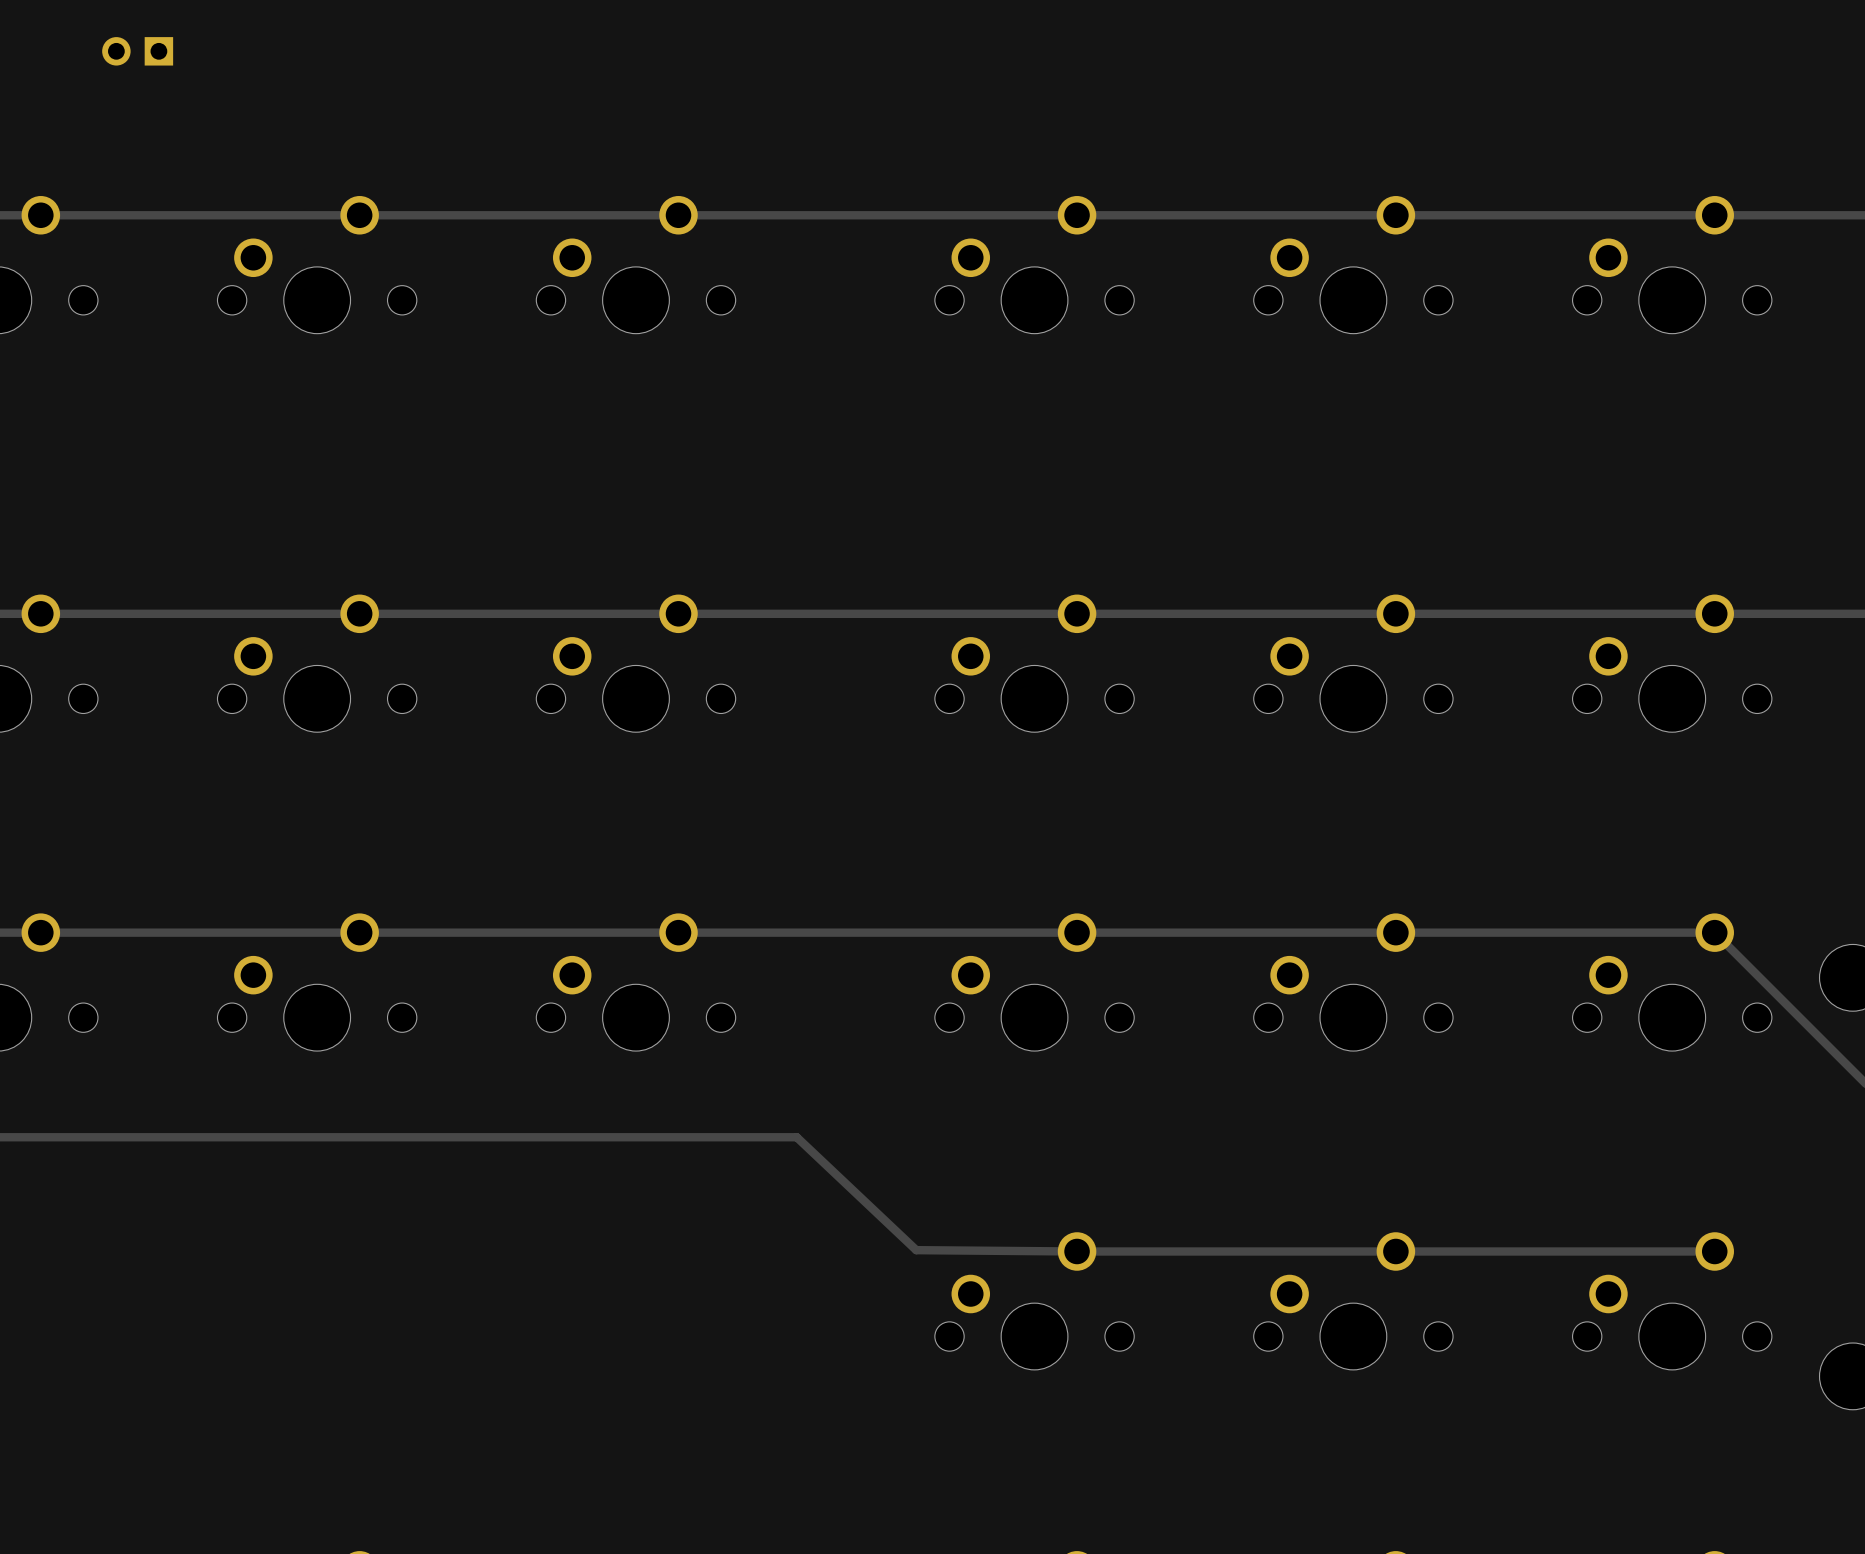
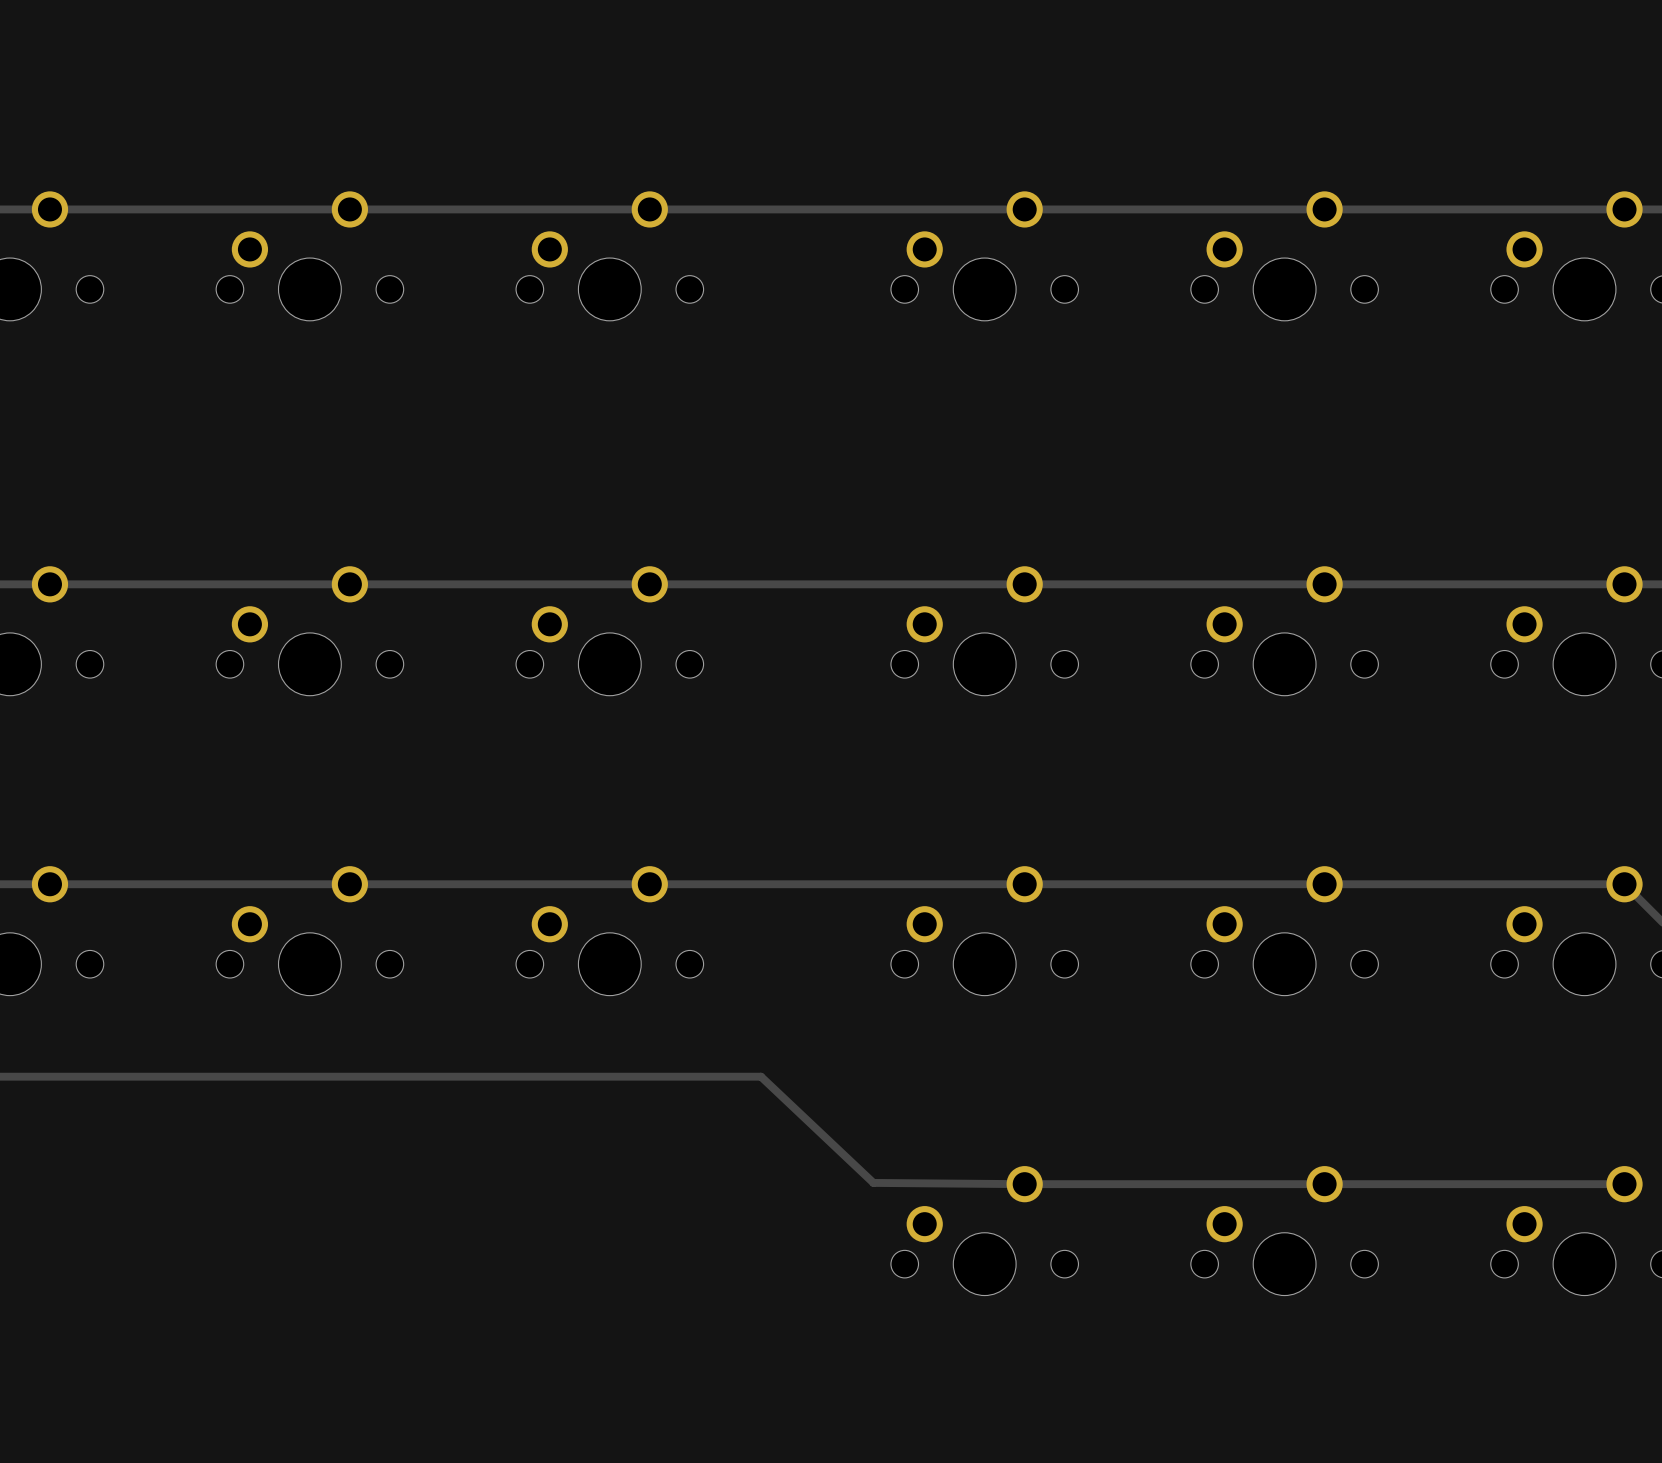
part: (137, 51) -> none

